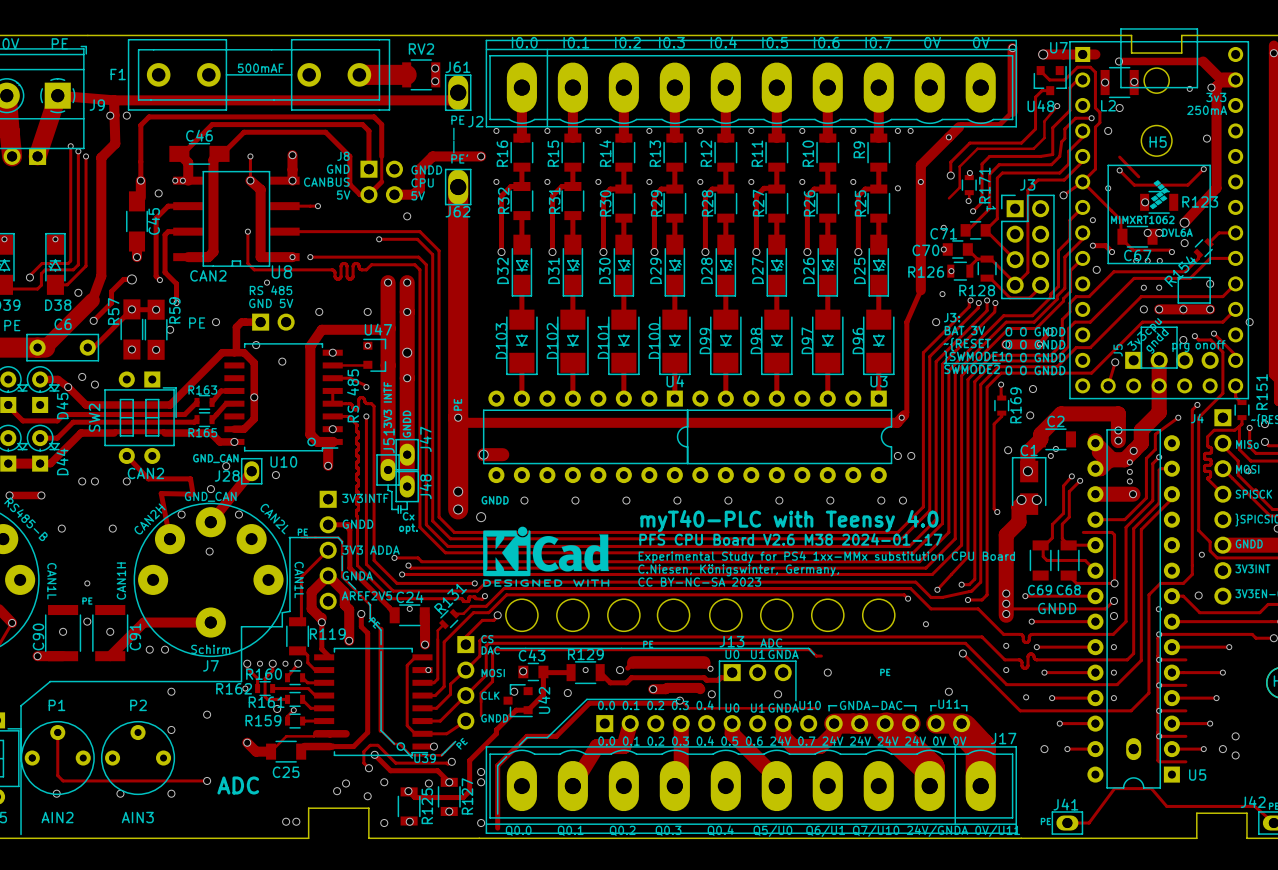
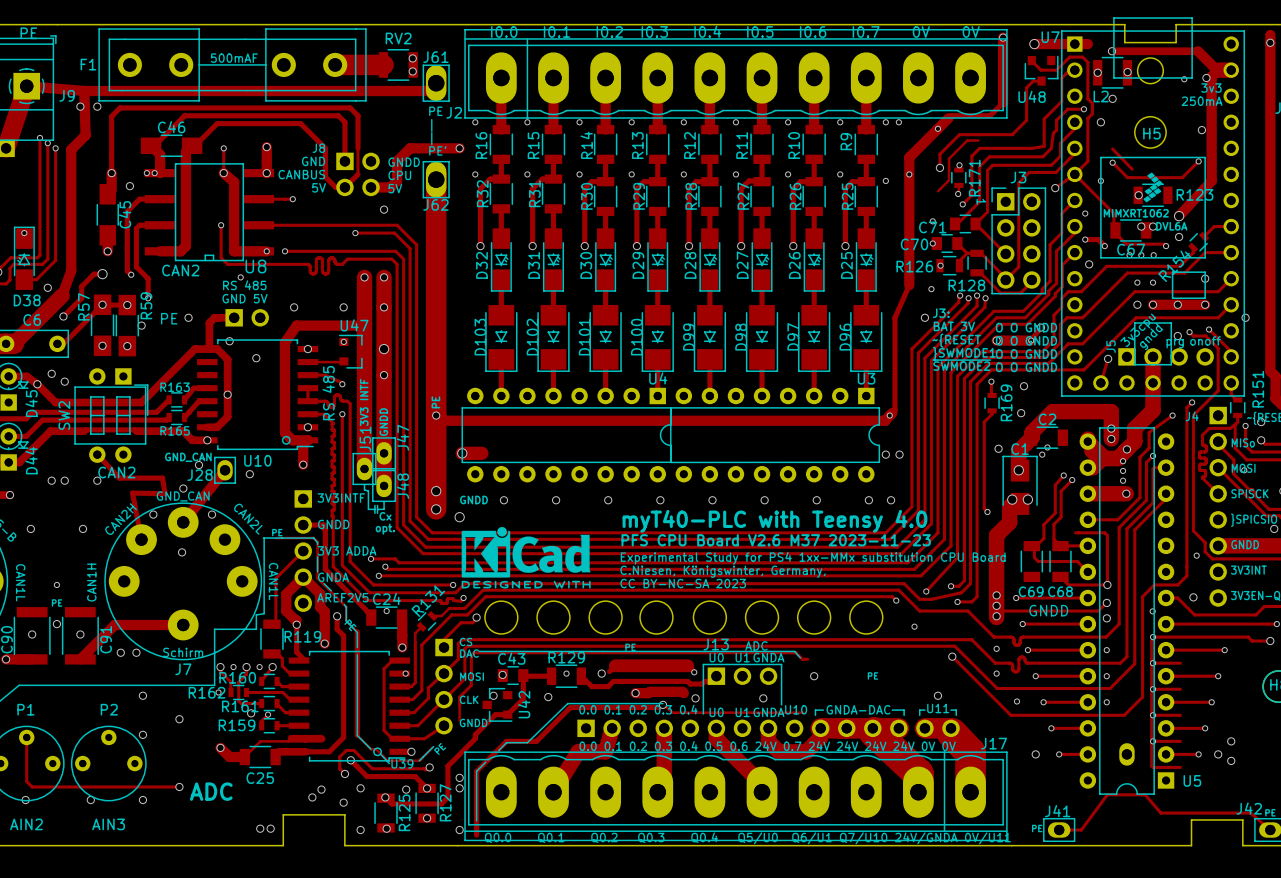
track: (1057, 106) (1044, 121) (1044, 137) (1033, 148) (988, 148) -> none
via: (1057, 106) -> none
text: PFS CPU Board V2.6 M38 2024-01-17 (790, 539) -> PFS CPU Board V2.6 M37 2023-11-23 (776, 540)

